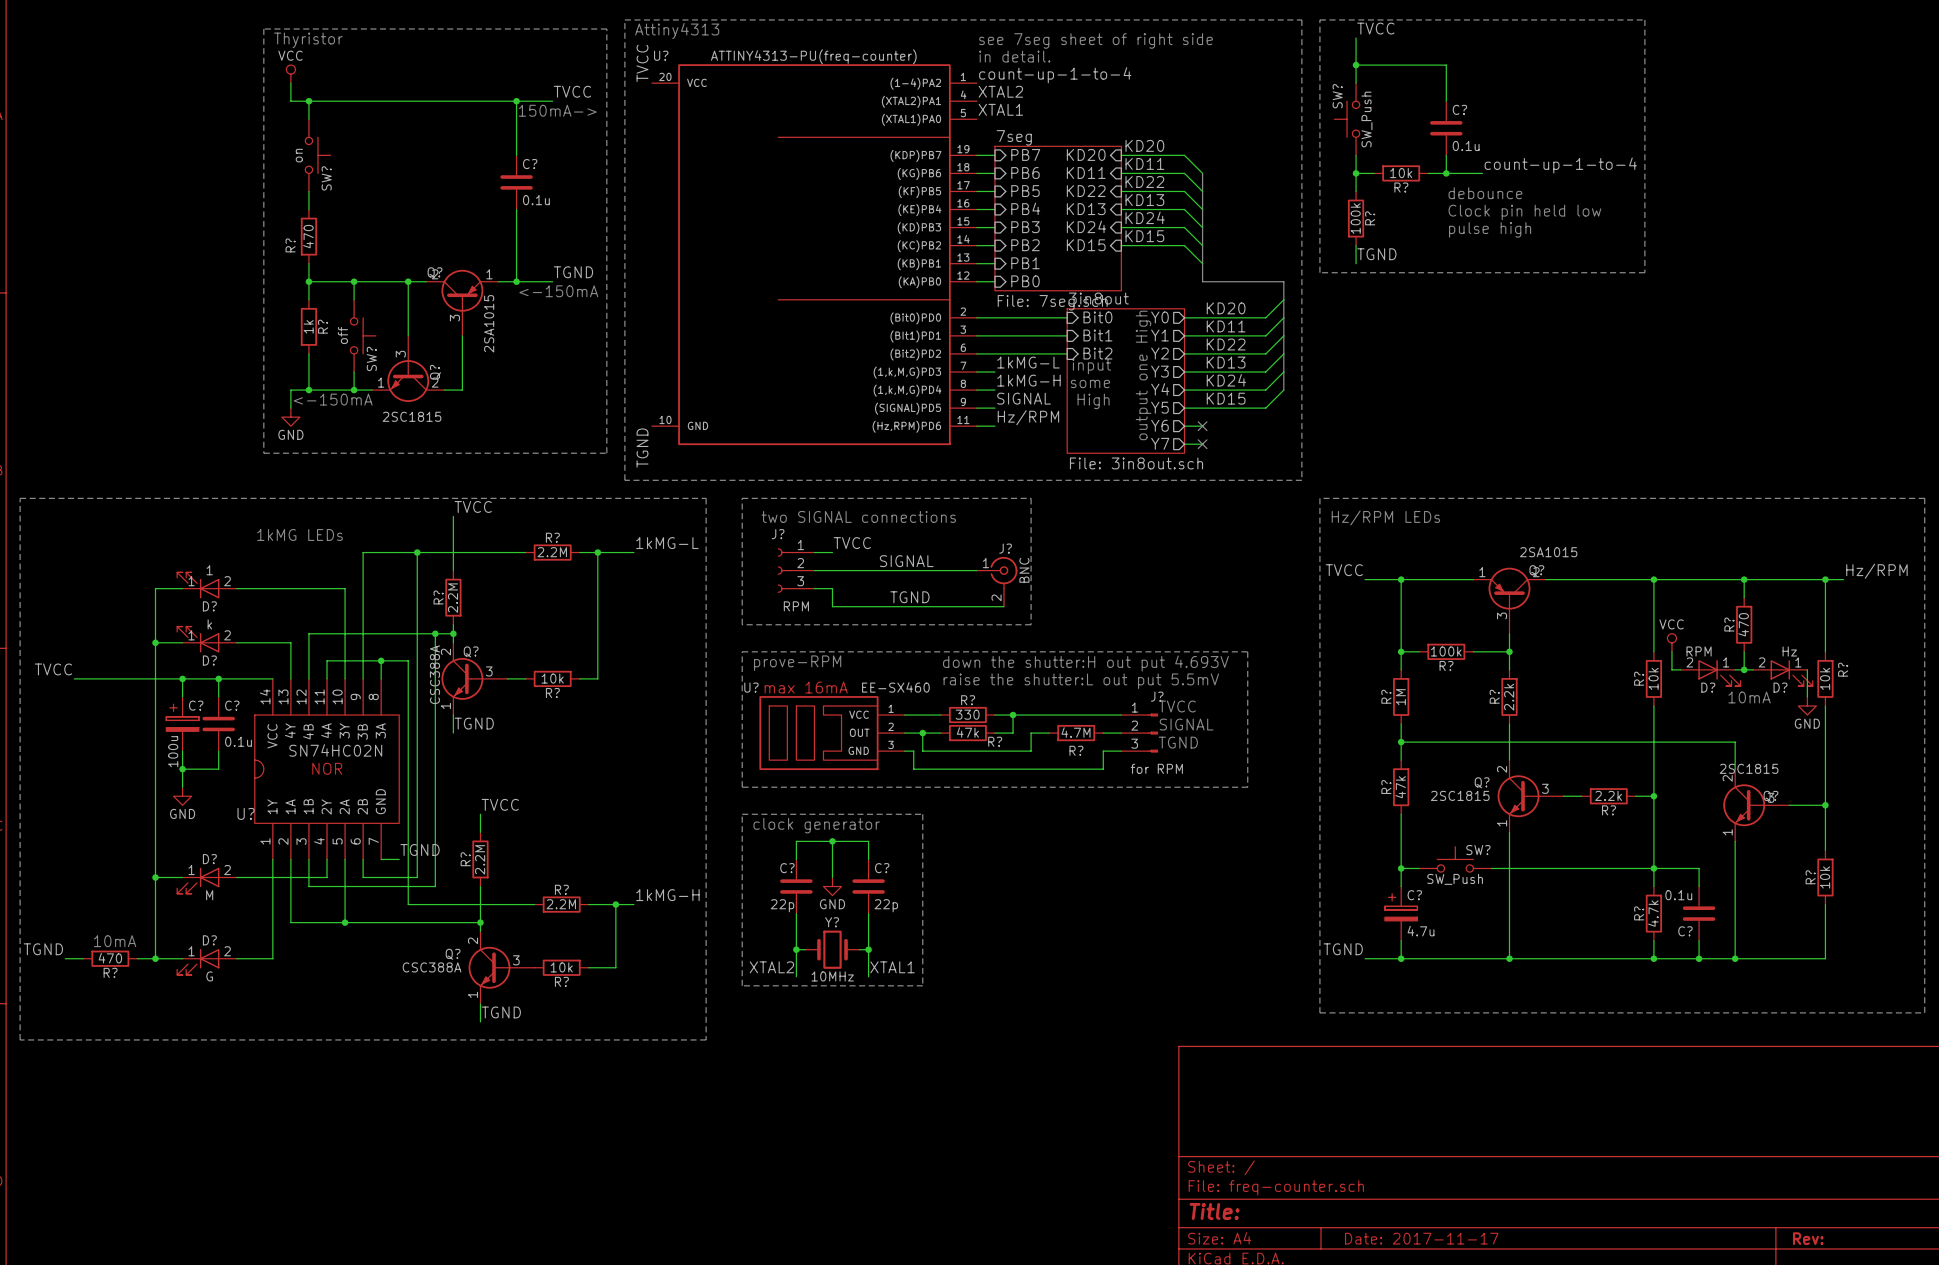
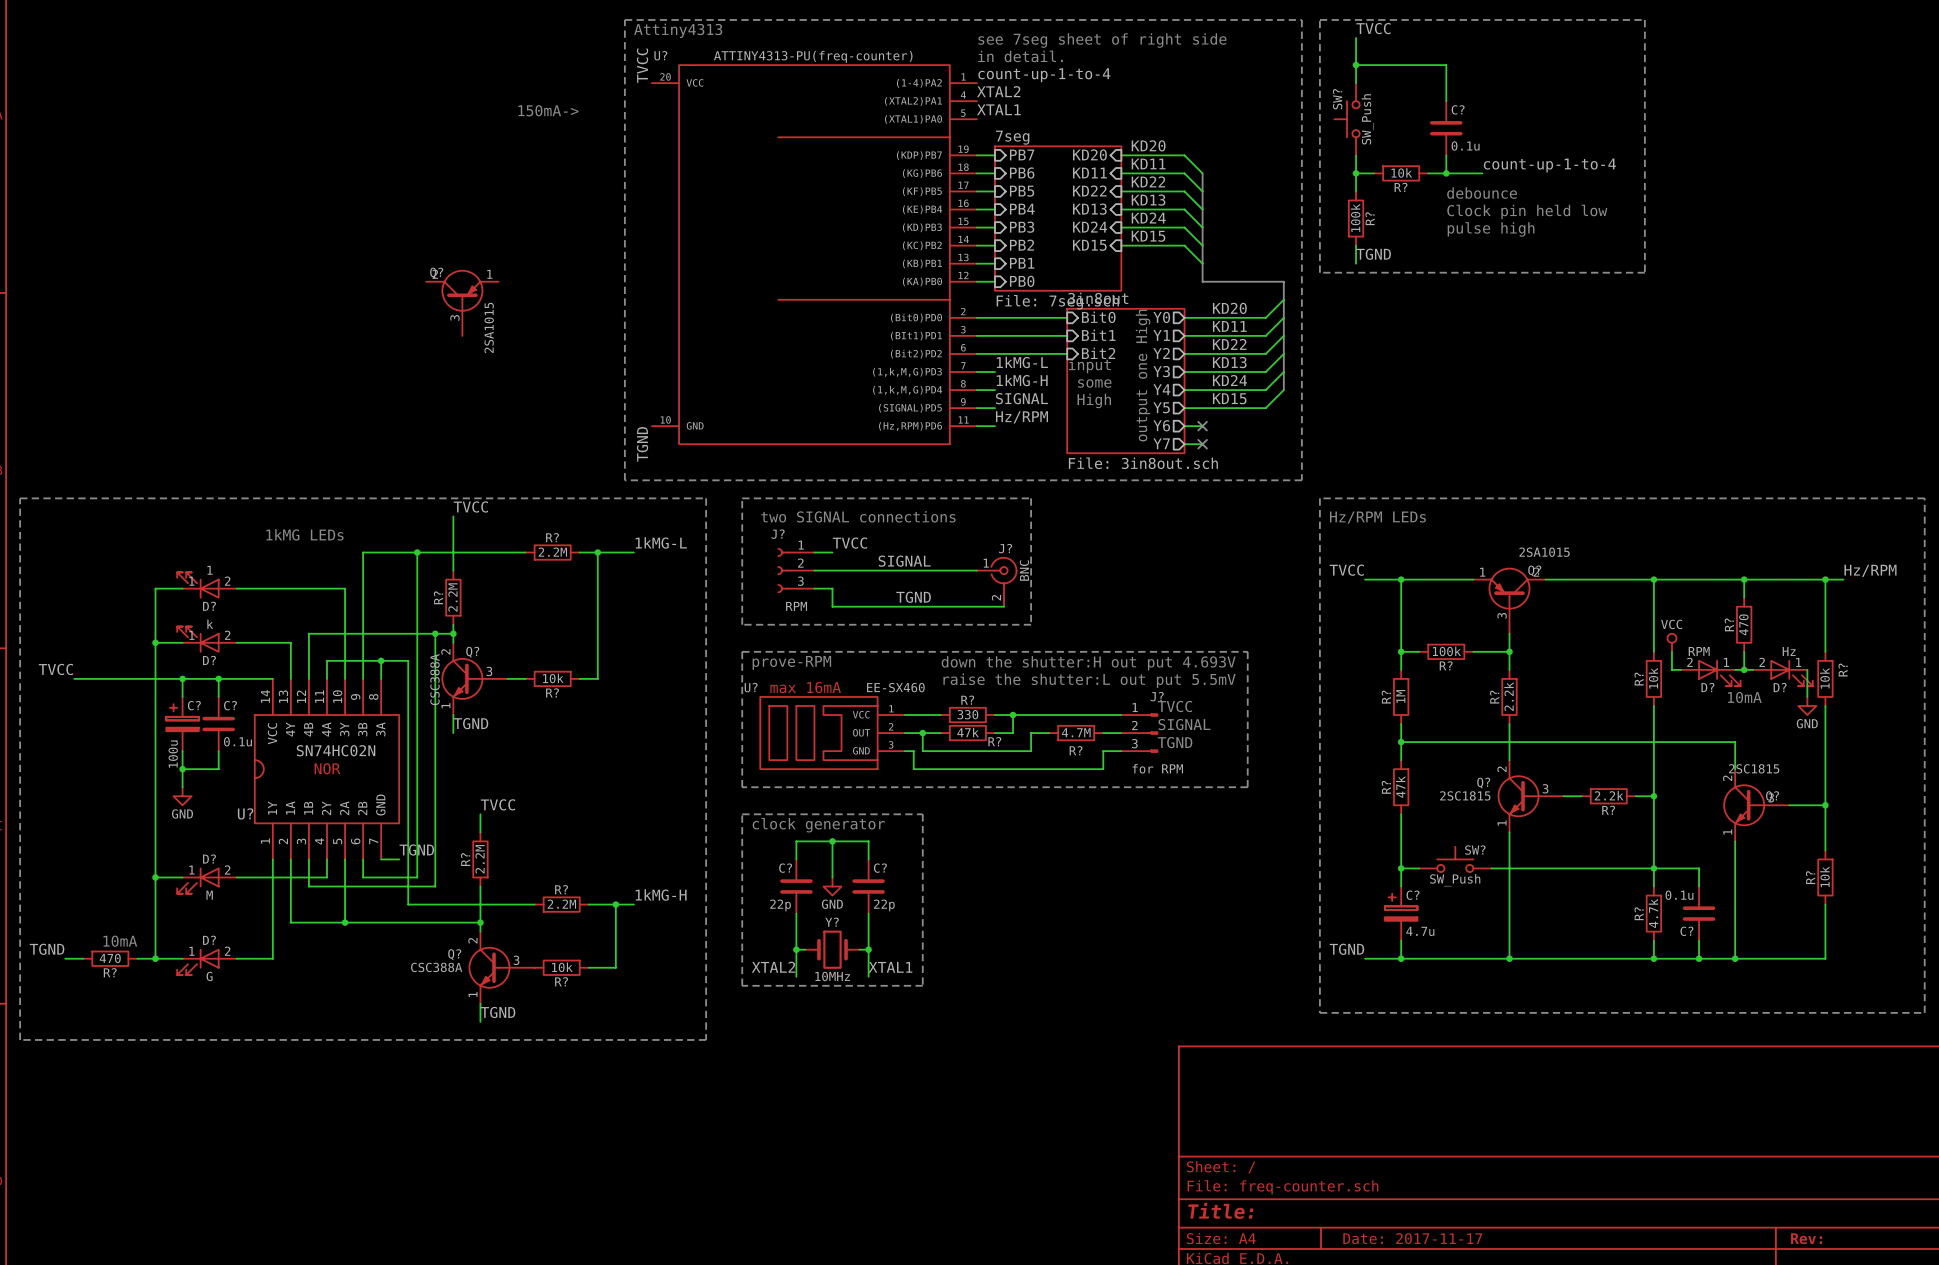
line: (263, 28) (263, 453) (606, 453) (606, 28) (263, 28) -> none
text: Thyristor (308, 40) -> none
power symbol: VCC (290, 74) -> none
wire: (290, 83) (290, 101) (552, 101) -> none
label: TVCC (572, 91) -> none
wire: (308, 101) (308, 119) -> none
junction: (308, 101) -> none
wire: (516, 101) (516, 155) -> none
junction: (516, 101) -> none
SW?: on (317, 155) -> none
C?: 0.1u (516, 182) -> none
wire: (308, 191) (308, 209) -> none
wire: (516, 209) (516, 281) -> none
R?: 470 (308, 236) -> none
wire: (308, 263) (308, 299) -> none
label: TGND (573, 272) -> none
wire: (308, 281) (426, 281) -> none
junction: (308, 281) -> none
wire: (354, 281) (354, 299) -> none
junction: (354, 281) -> none
wire: (408, 281) (408, 335) -> none
junction: (408, 281) -> none
wire: (498, 281) (552, 281) -> none
junction: (516, 281) -> none
text: <-150mA (558, 291) -> none
R?: 1k (308, 326) -> none
SW?: off (363, 335) -> none
wire: (462, 335) (462, 390) (444, 390) -> none
wire: (308, 353) (308, 390) -> none
Q?: 2SC1815 (408, 368) -> none
wire: (354, 372) (354, 390) -> none
junction: (308, 390) -> none
junction: (354, 390) -> none
wire: (372, 390) (290, 390) (290, 408) -> none
text: <-150mA (333, 399) -> none
power symbol: GND (290, 417) -> none

